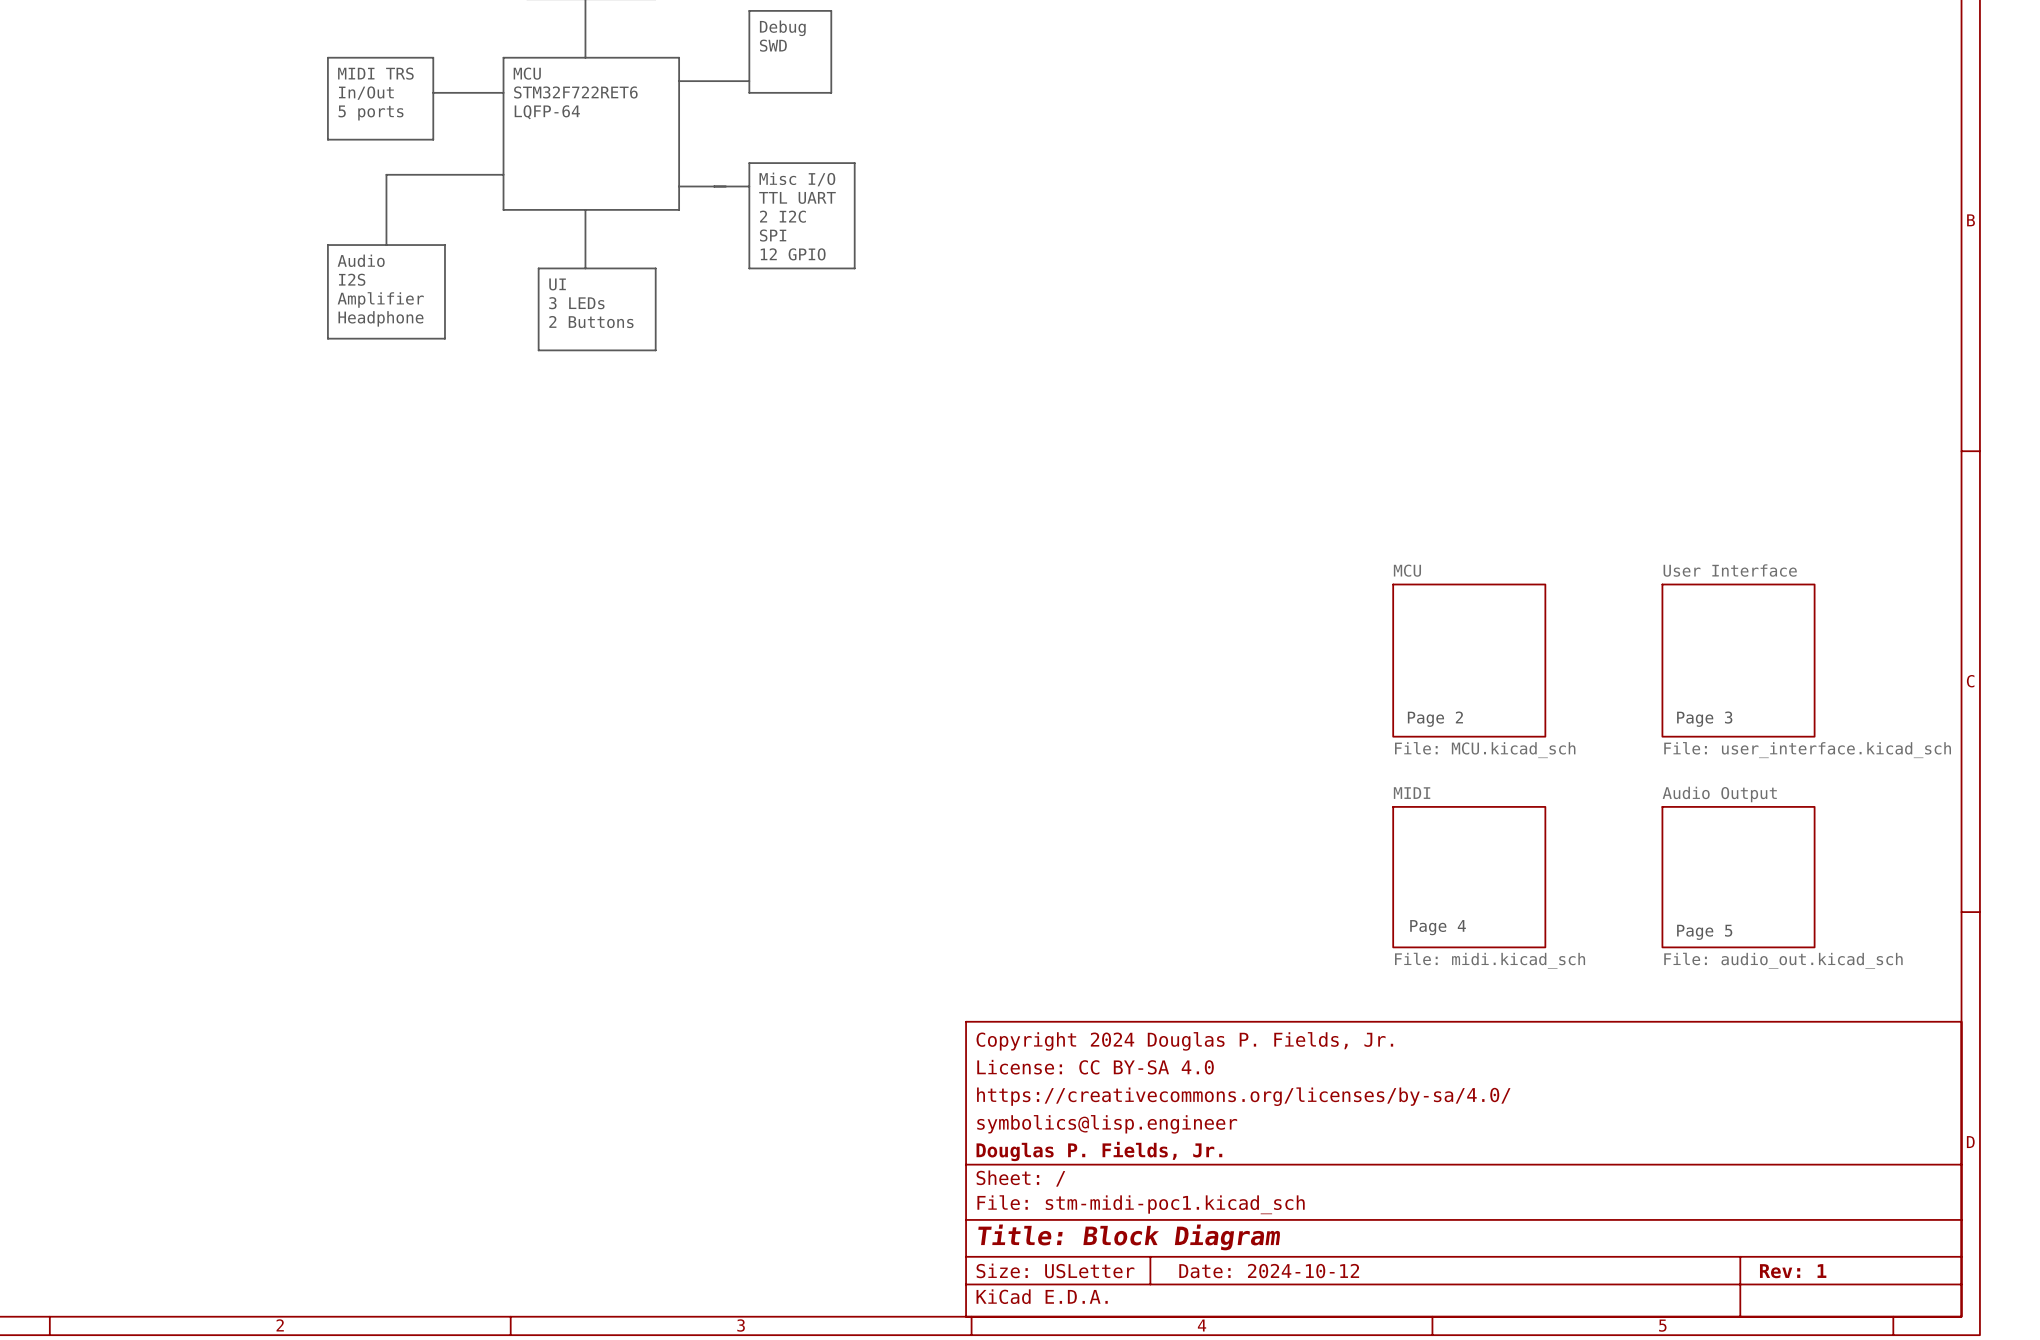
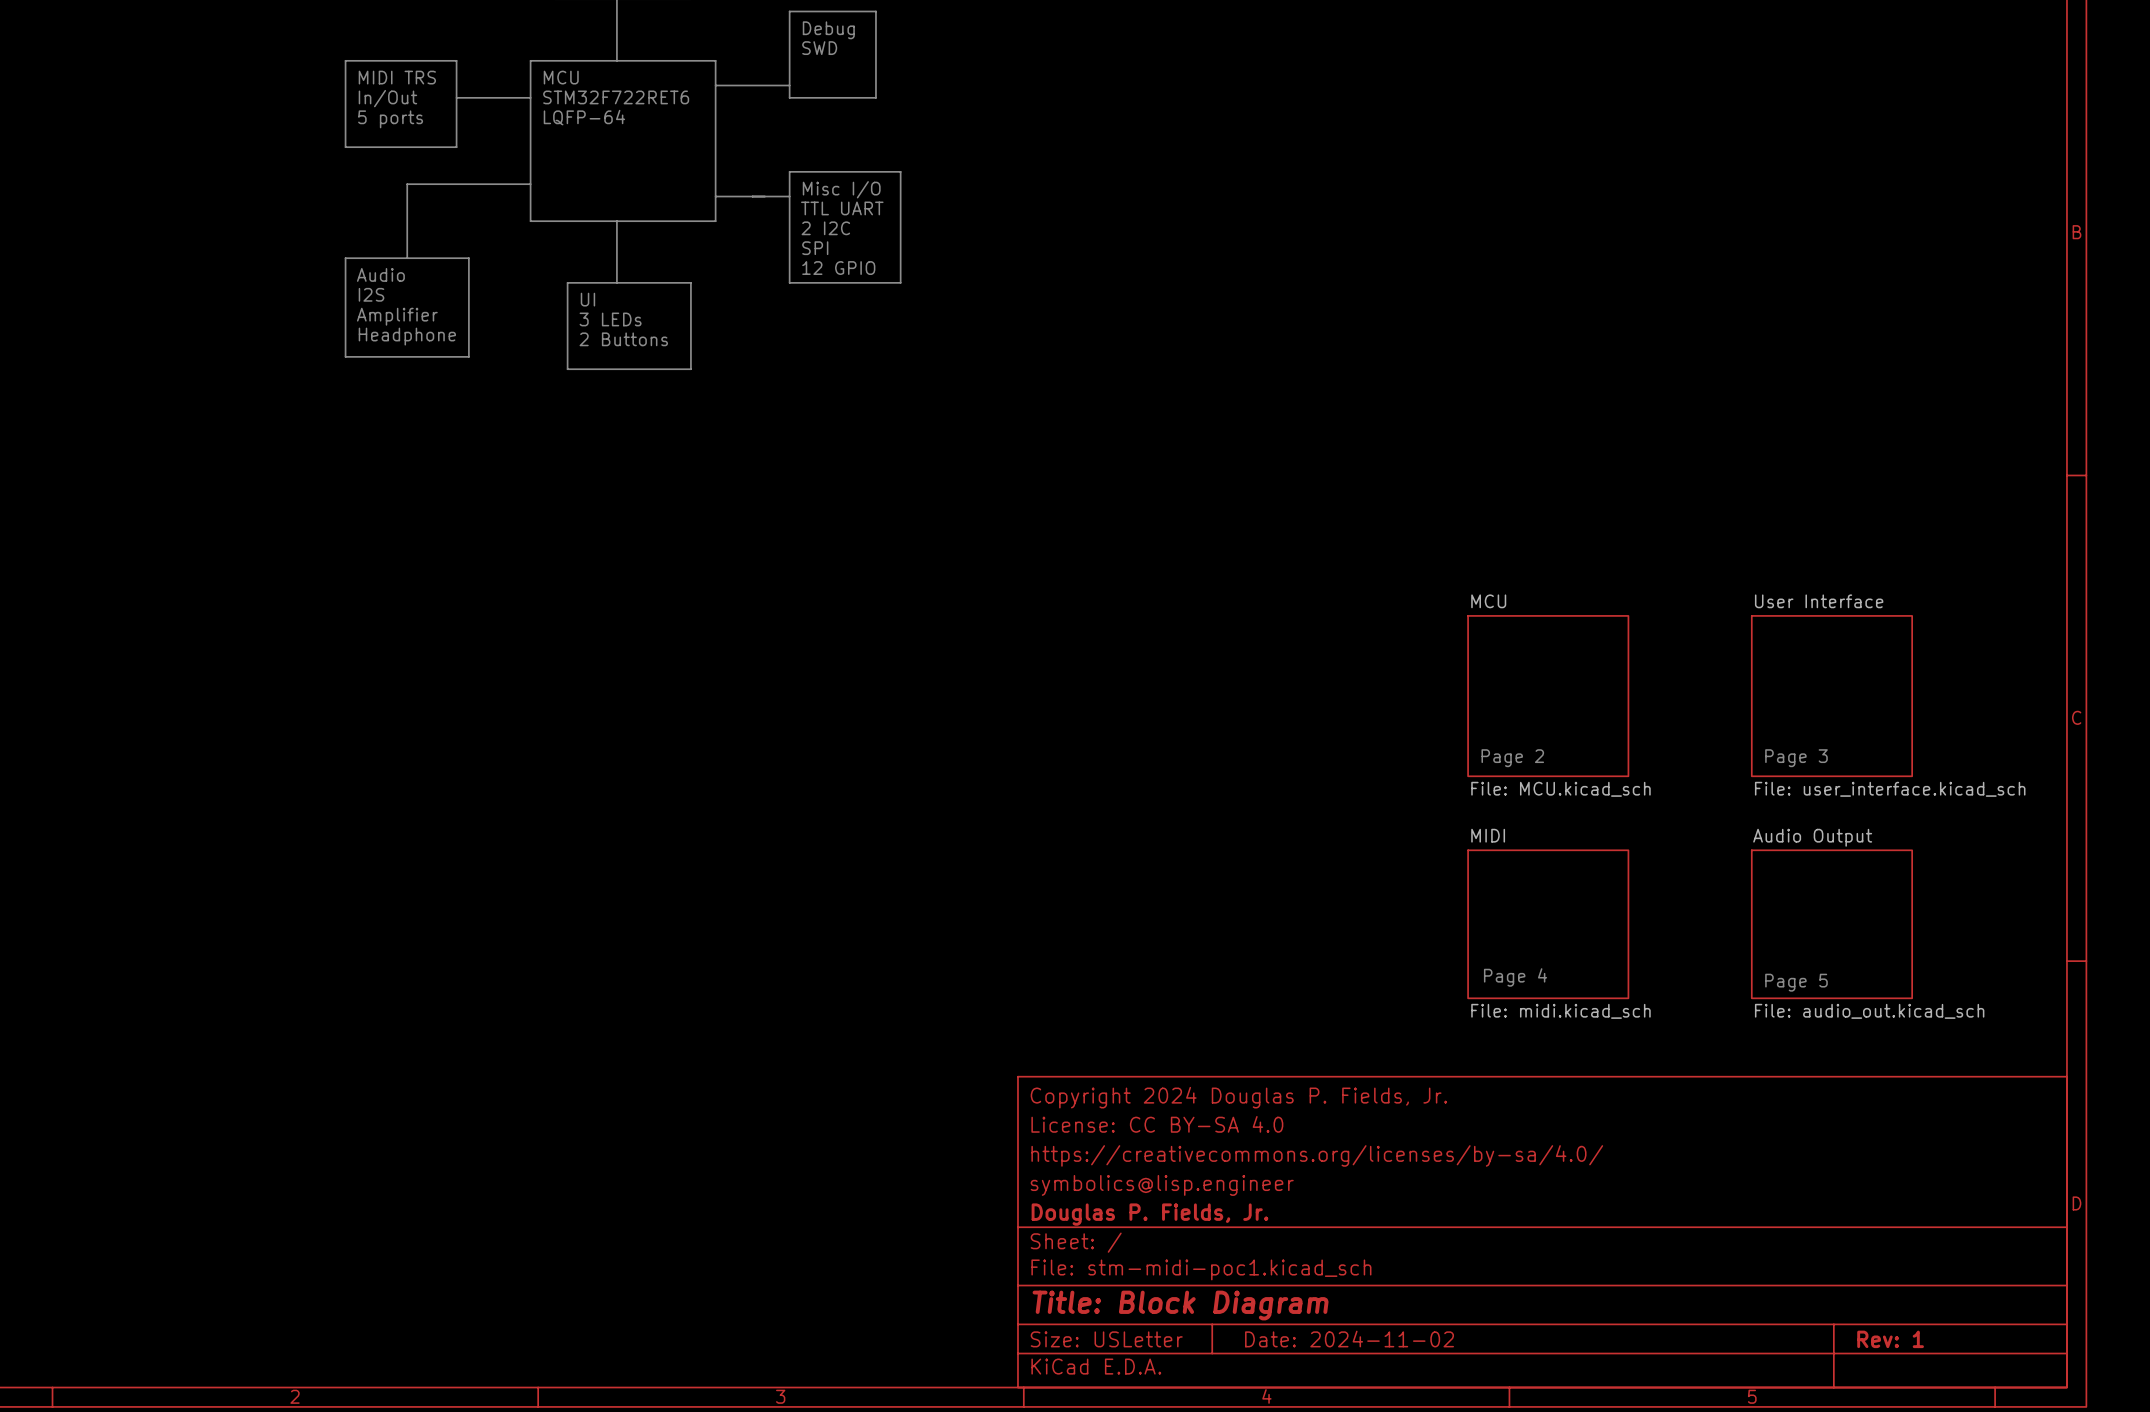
title block: Date: 2024-10-12 (1269, 1271) -> Date: 2024-11-02 (1349, 1339)

